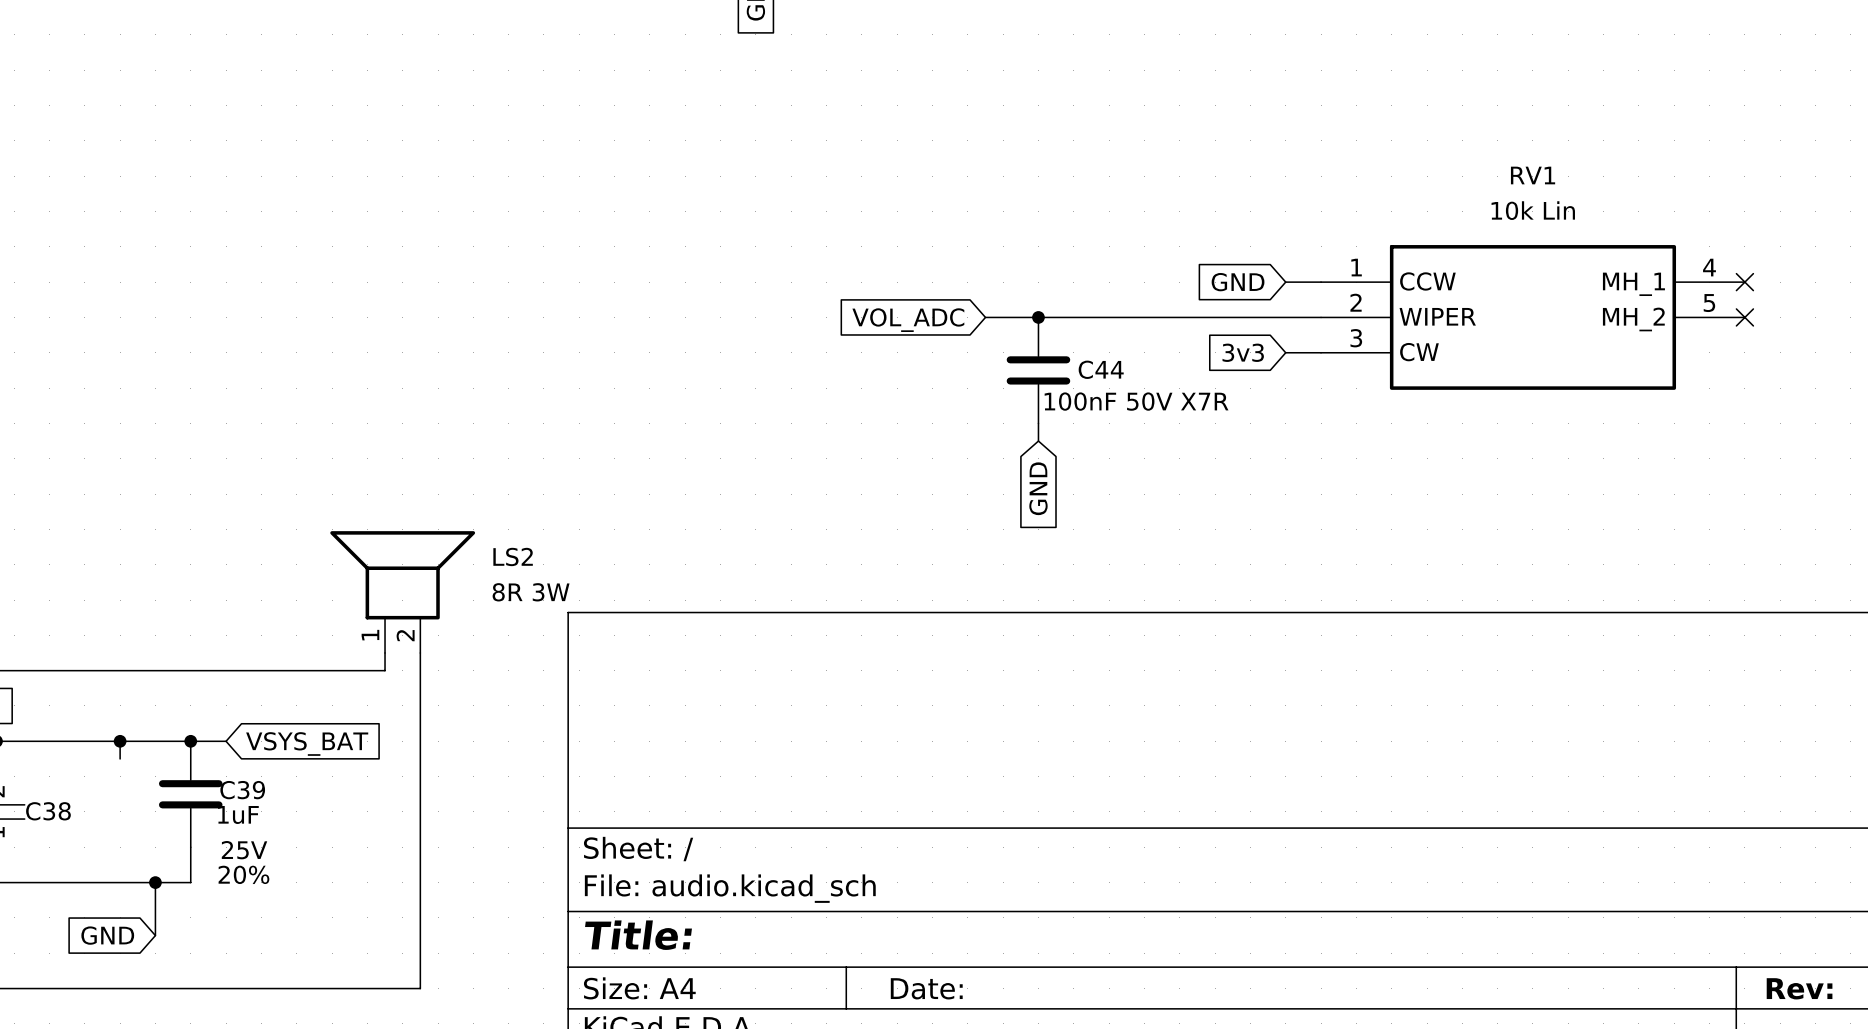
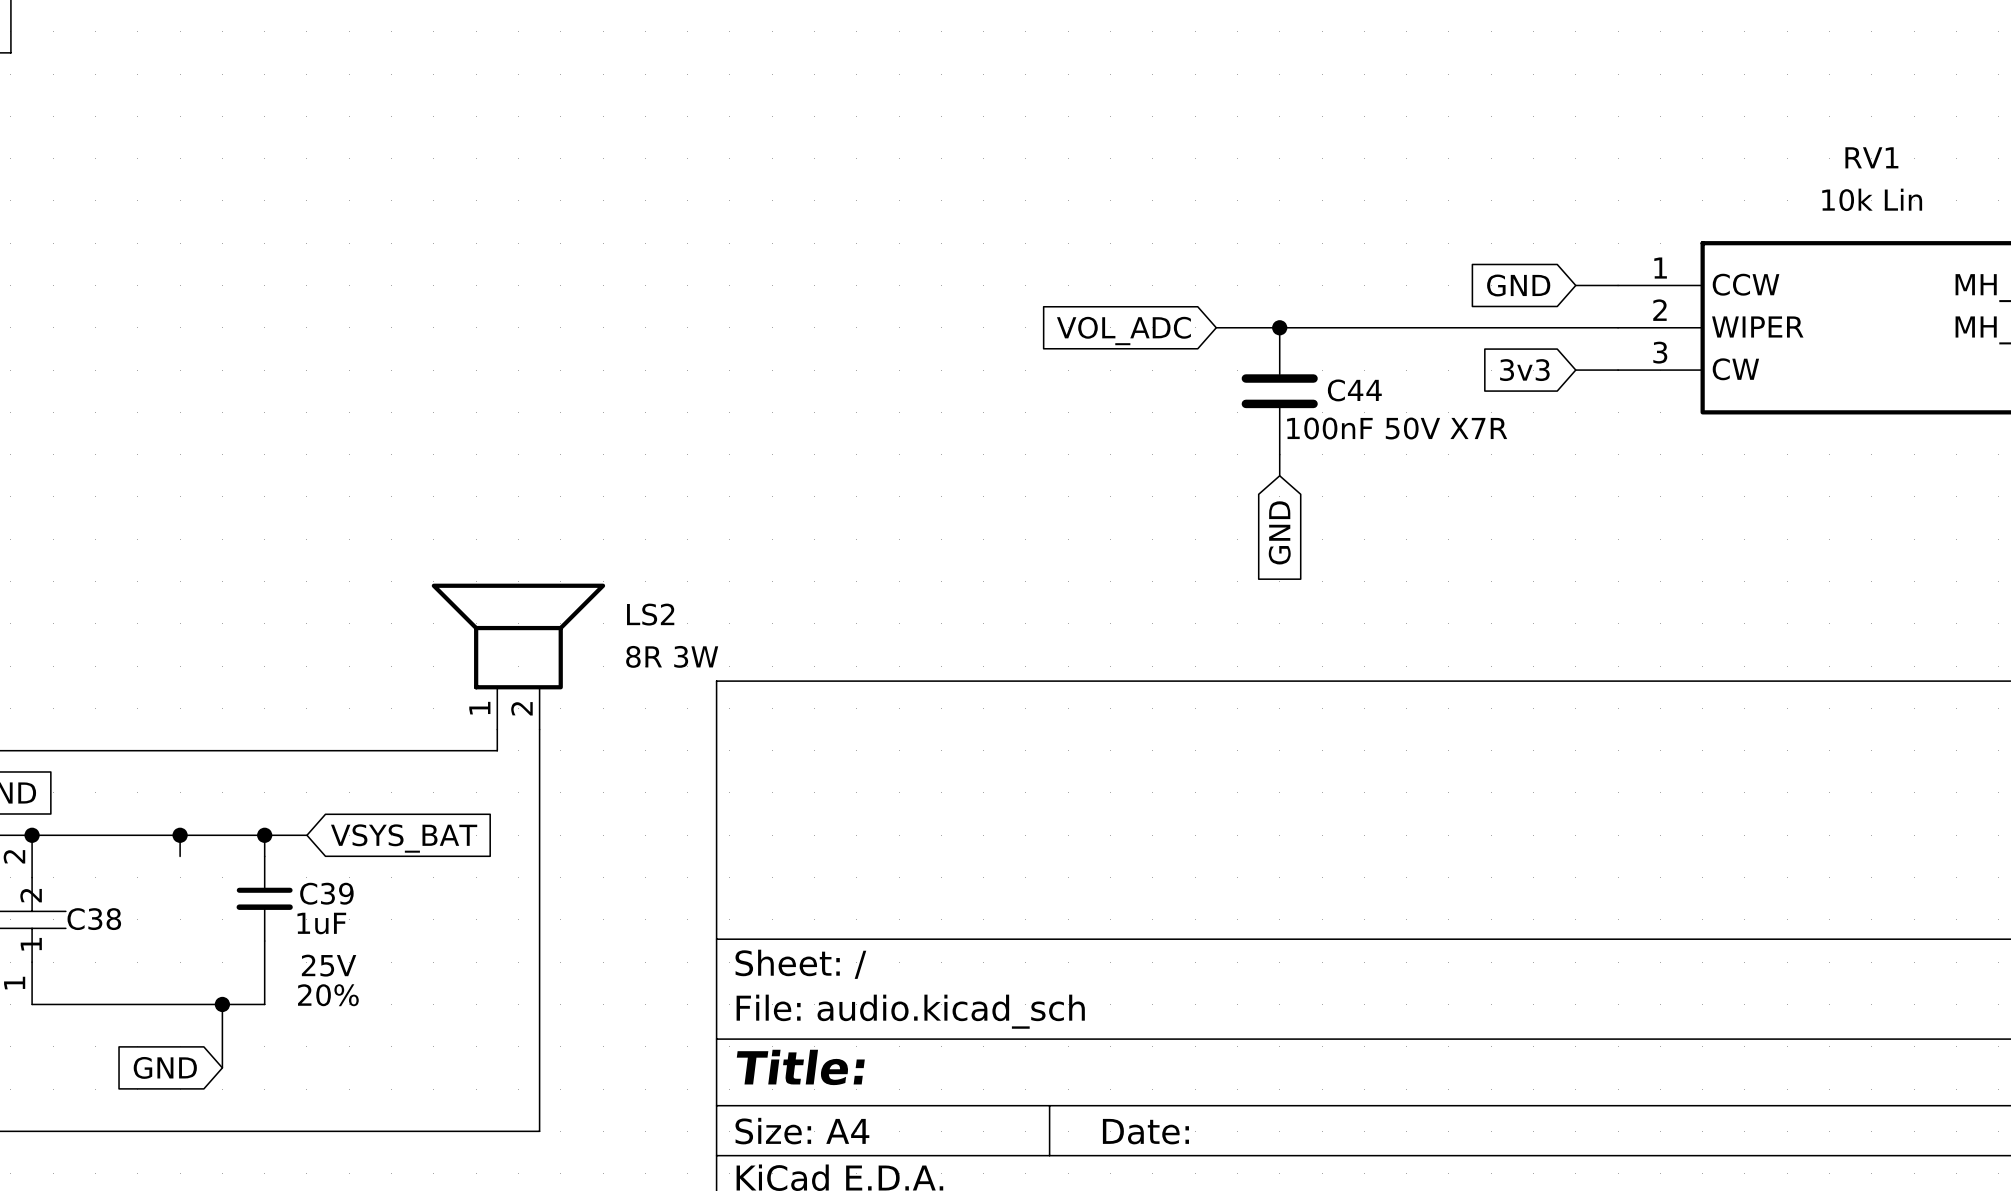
C39 symbol: [158, 741, 223, 848] -> [236, 856, 293, 942]

